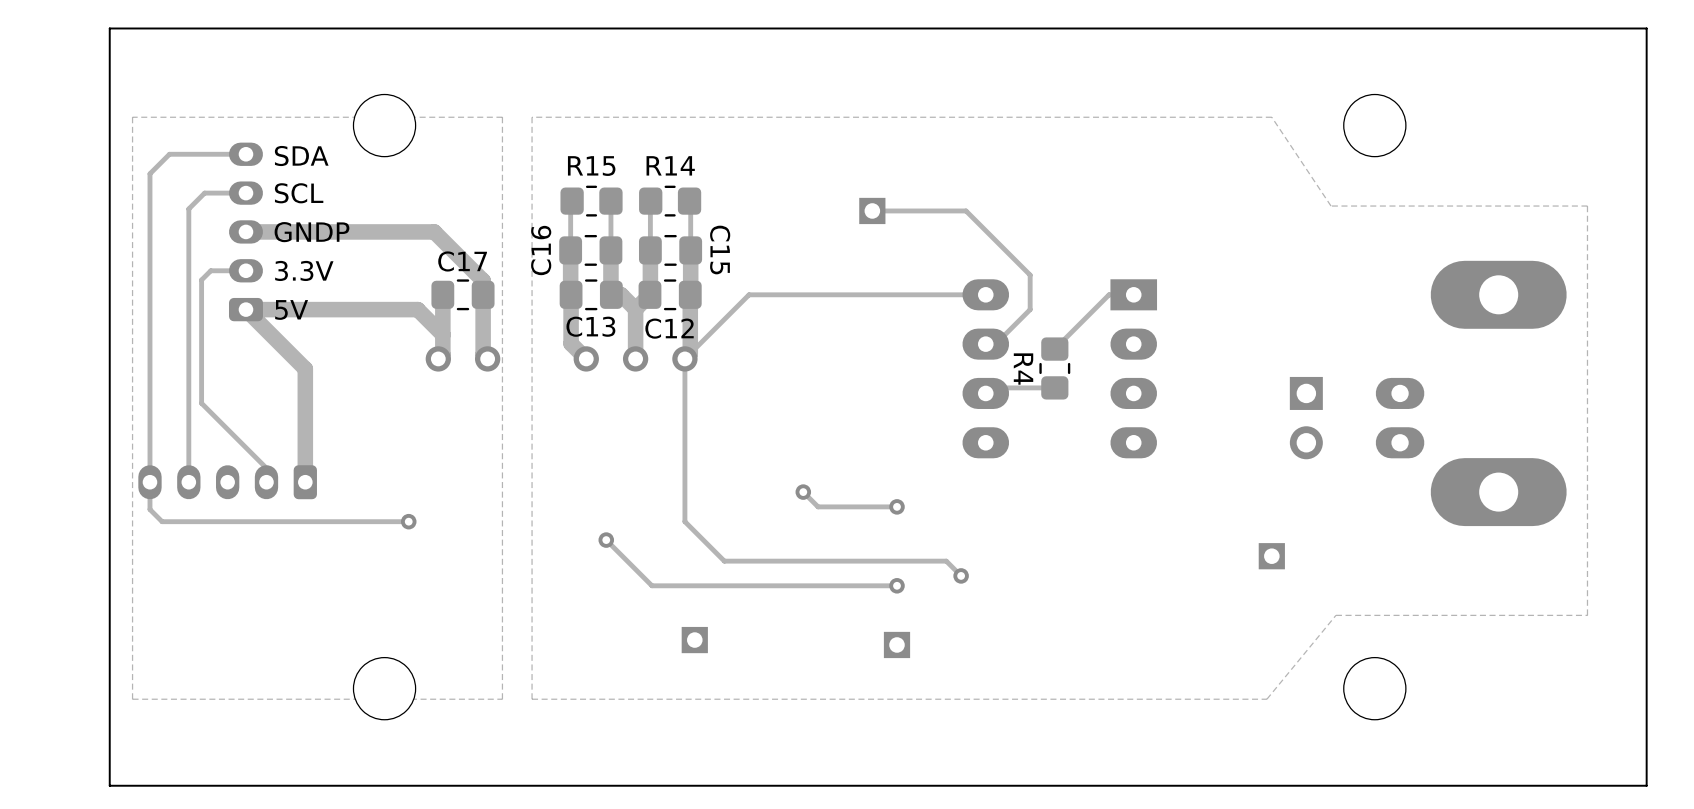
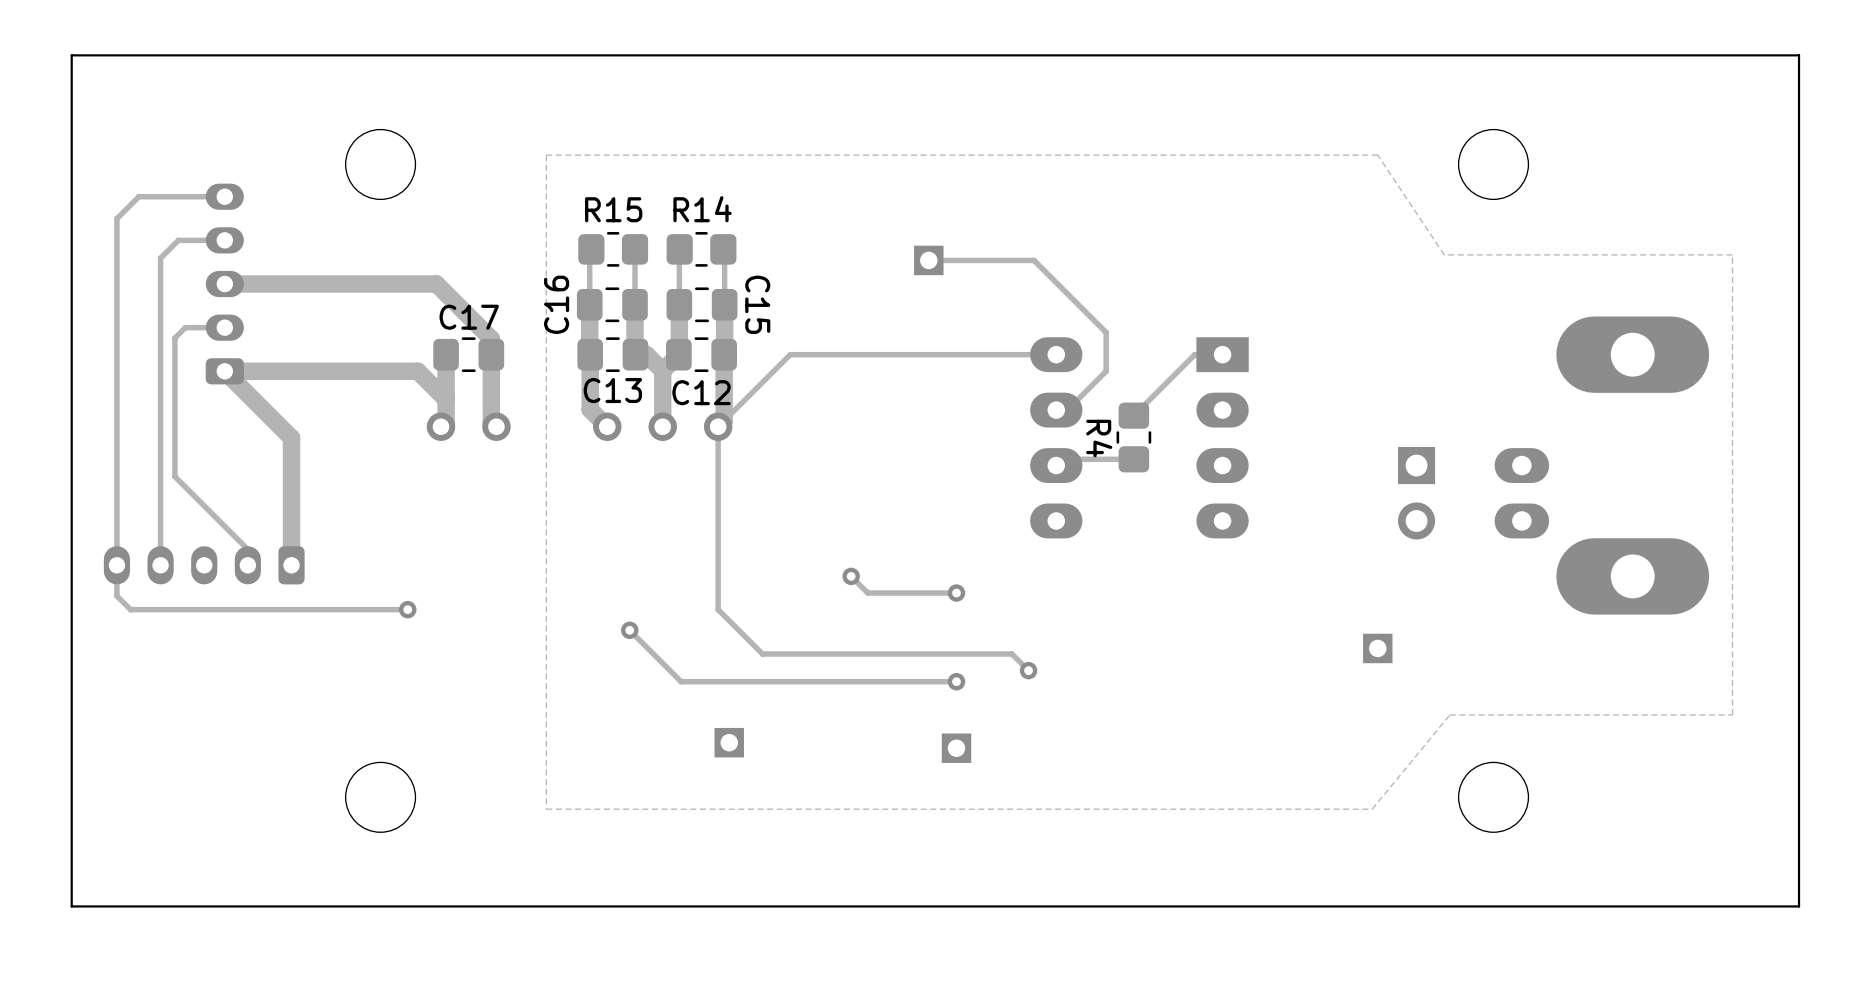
zone outline: (502, 117) (502, 699) (132, 699) (132, 117) (502, 117) -> none
text: SDA (301, 156) -> none
text: SCL (299, 193) -> none
text: GNDP (311, 232) -> none
text: 3.3V (304, 270) -> none
text: 5V (291, 309) -> none

